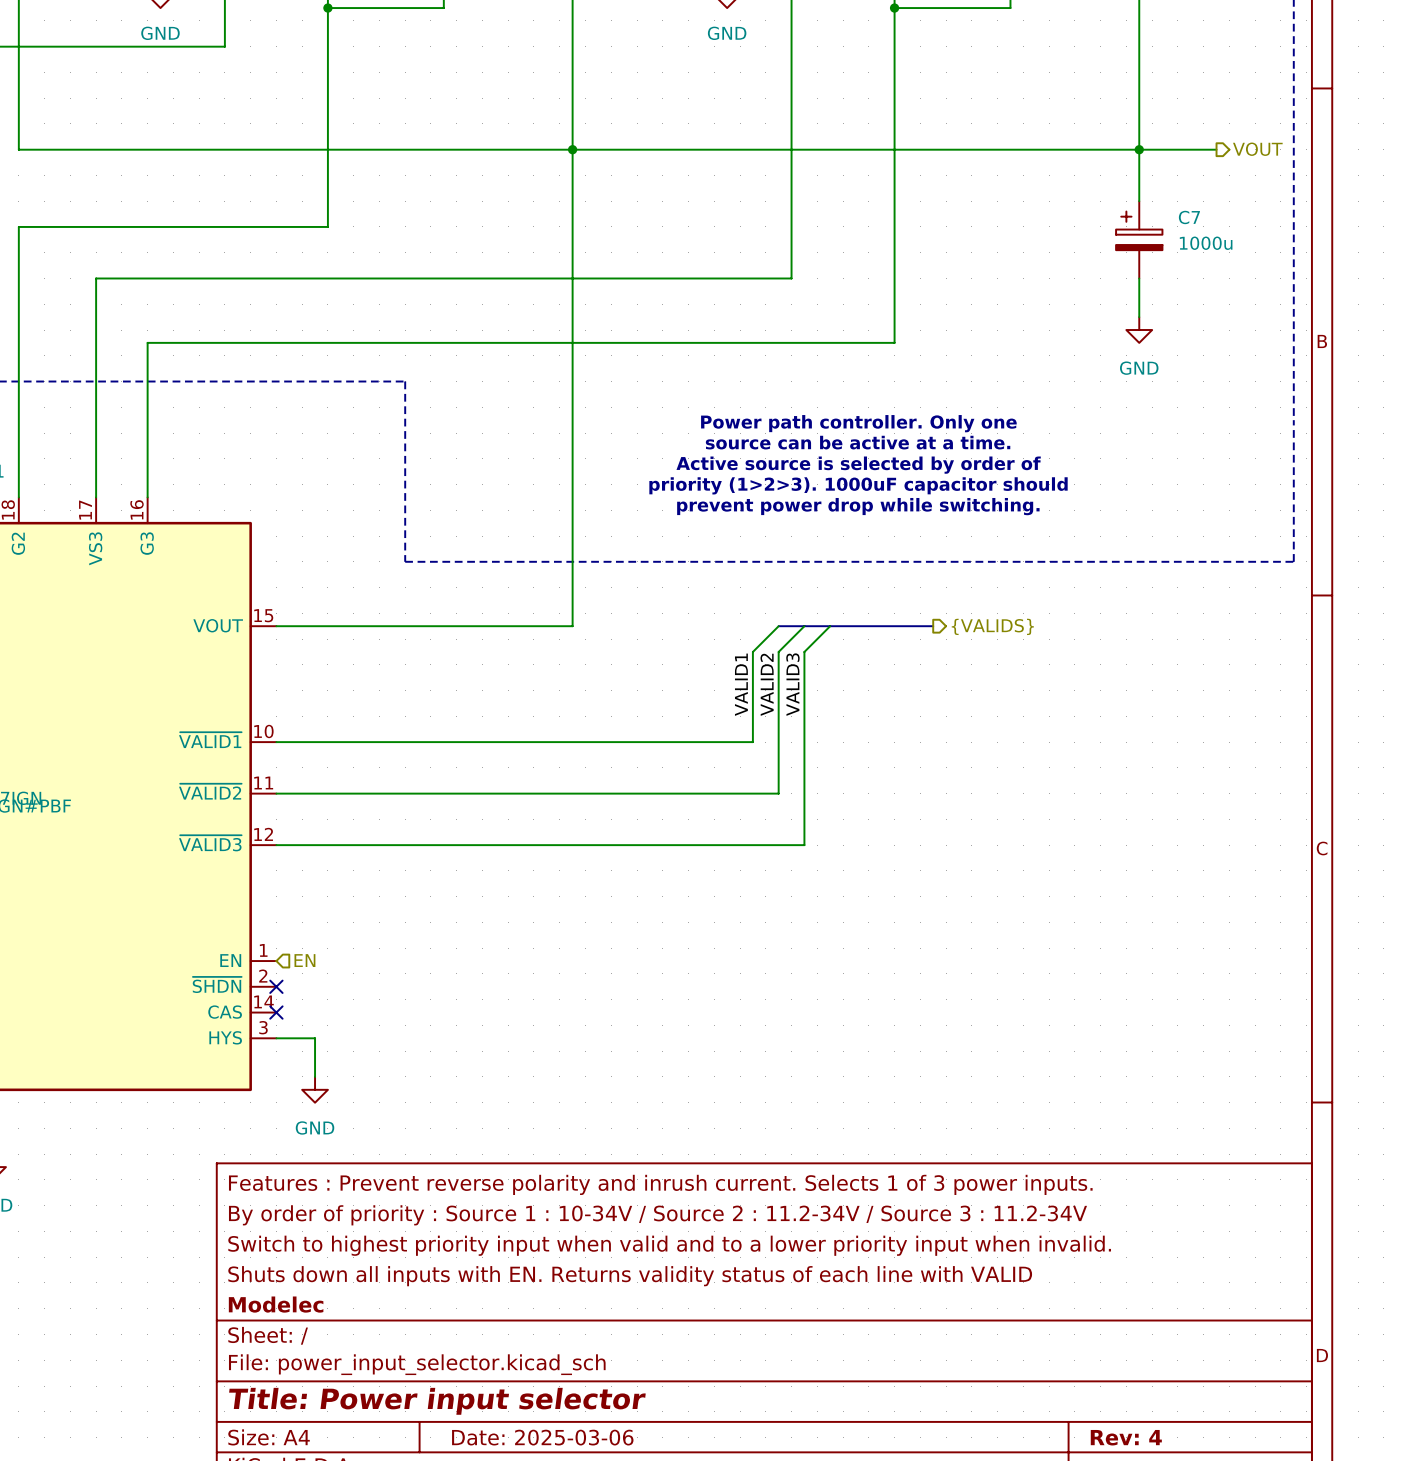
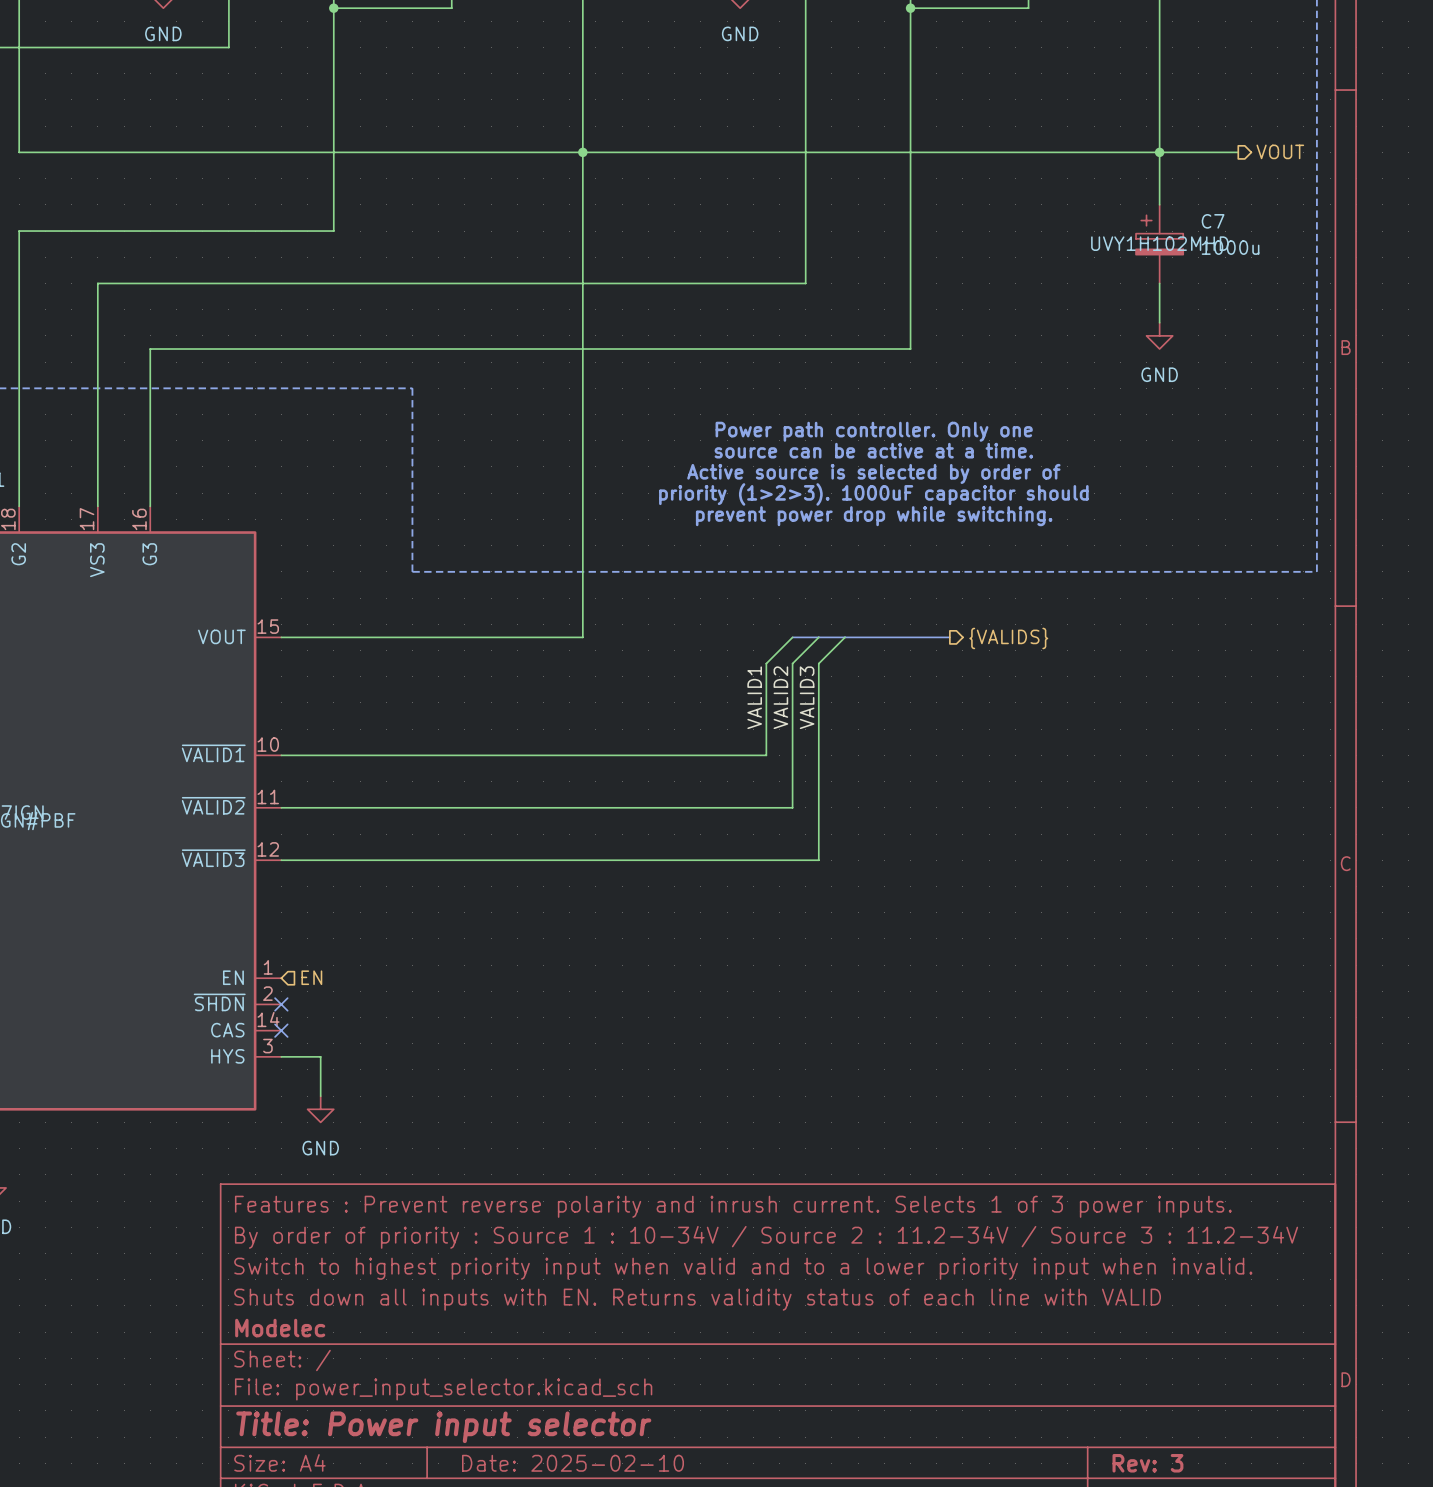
C7 text: none -> UVY1H102MHD (1159, 243)
title block: Date: 2025-03-06 (542, 1437) -> Date: 2025-02-10 (573, 1463)
title block: Rev: 4 (1126, 1437) -> Rev: 3 (1147, 1463)

